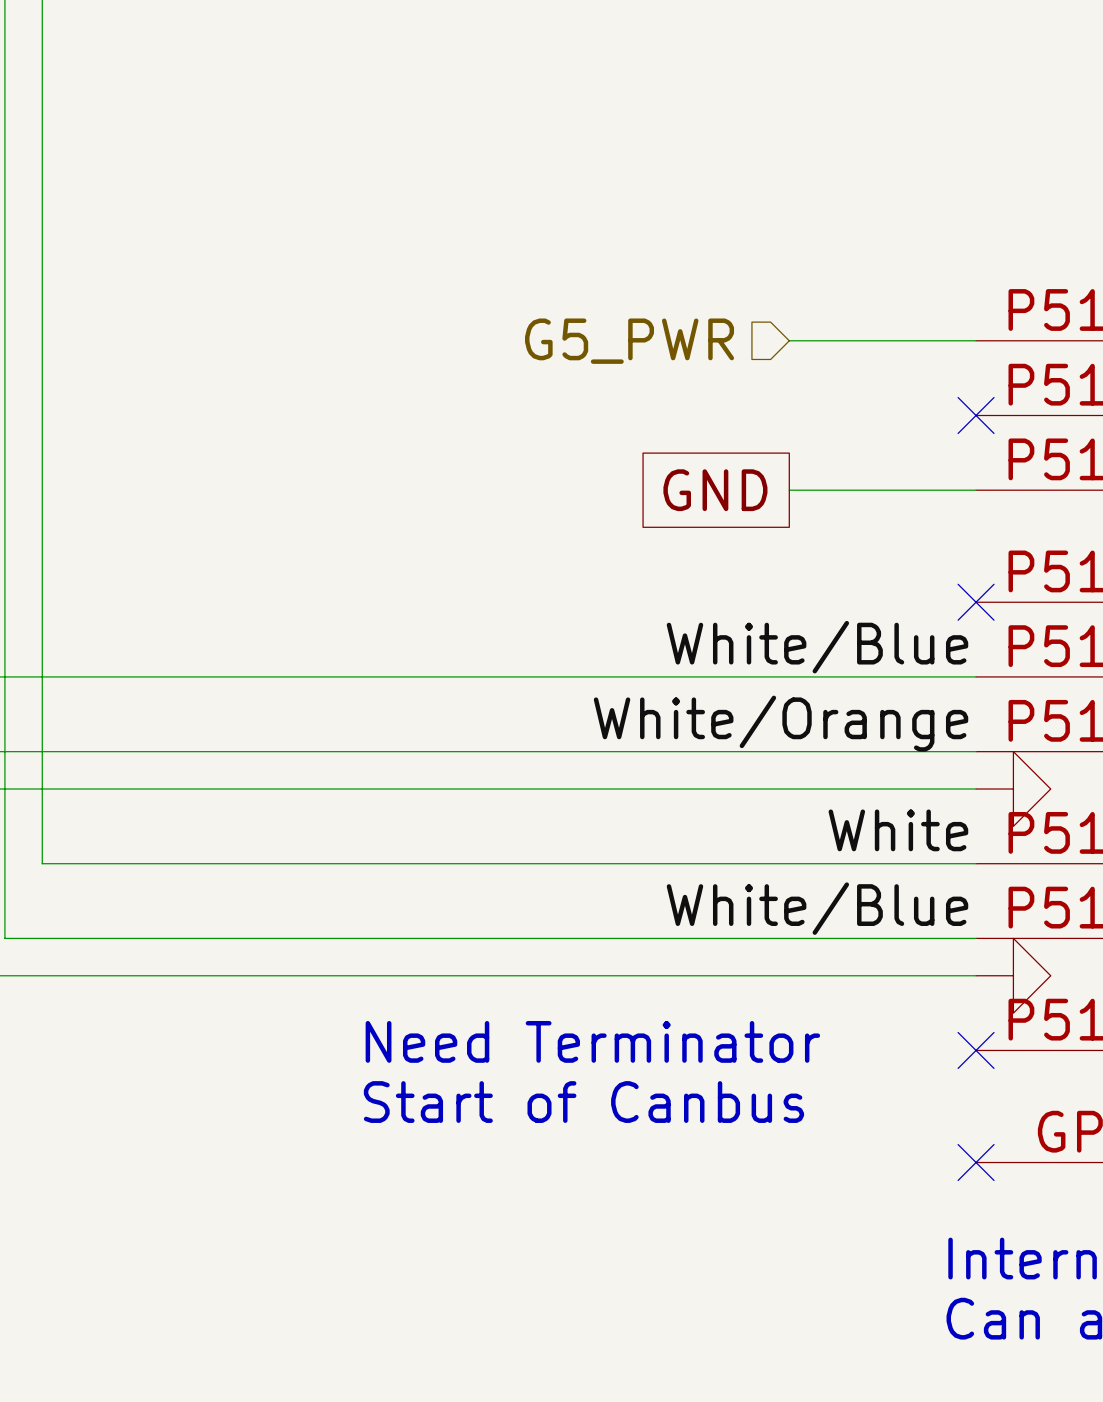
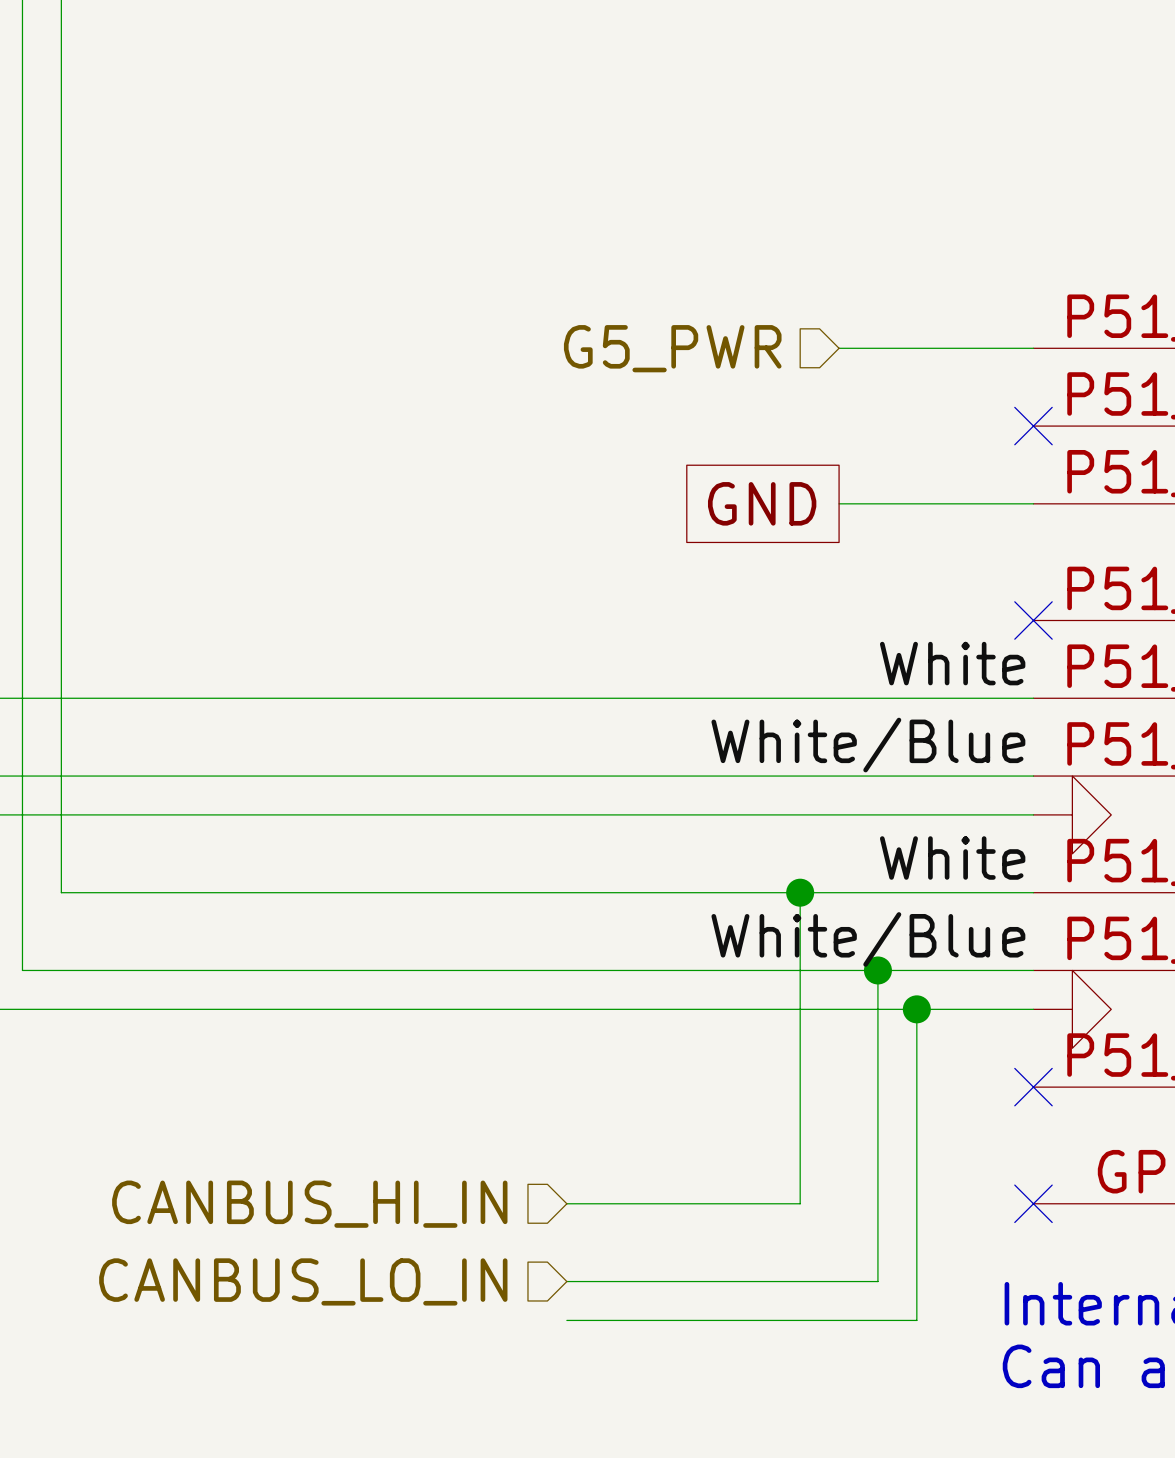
label: White/Blue (817, 647) -> White (952, 663)
label: White/Orange (781, 723) -> White/Blue (868, 745)
wire: none -> (800, 892) (800, 1203) (566, 1203)
junction: none -> (800, 892)
wire: none -> (877, 970) (877, 1281) (566, 1281)
junction: none -> (877, 970)
wire: none -> (916, 1009) (916, 1320) (566, 1320)
junction: none -> (916, 1009)
text: Need Terminator (592, 1041) -> none
text: Start of Canbus (583, 1102) -> none
hierarchical label: none -> CANBUS_HI_IN (309, 1204)
hierarchical label: none -> CANBUS_LO_IN (303, 1281)

